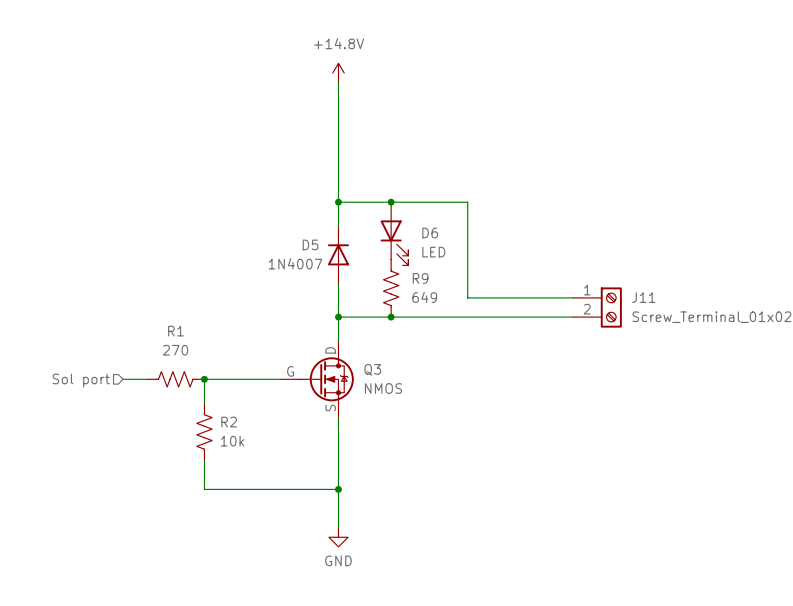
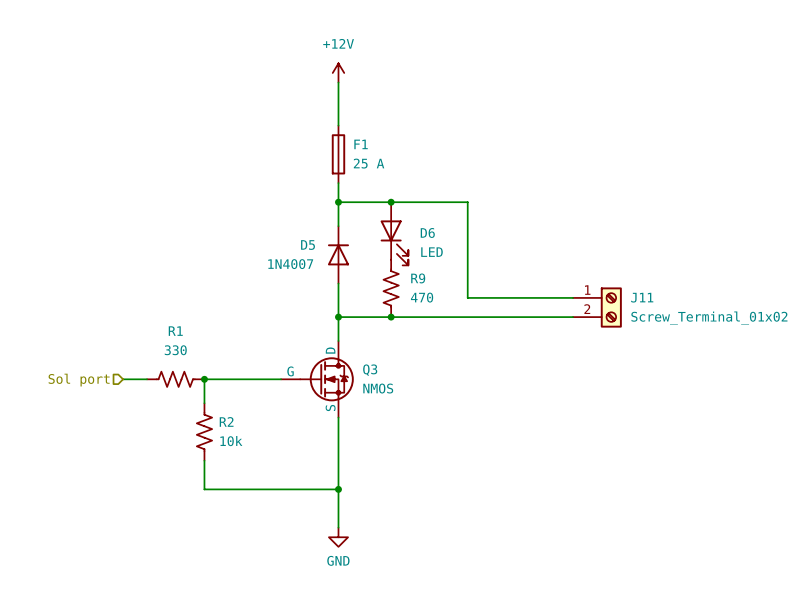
power symbol: +14.8V (338, 72) -> +12V (338, 72)
F1: none -> 25 A (338, 154)
R9 value: 649 (424, 297) -> 470 (422, 297)
R1 value: 270 (175, 350) -> 330 (175, 350)

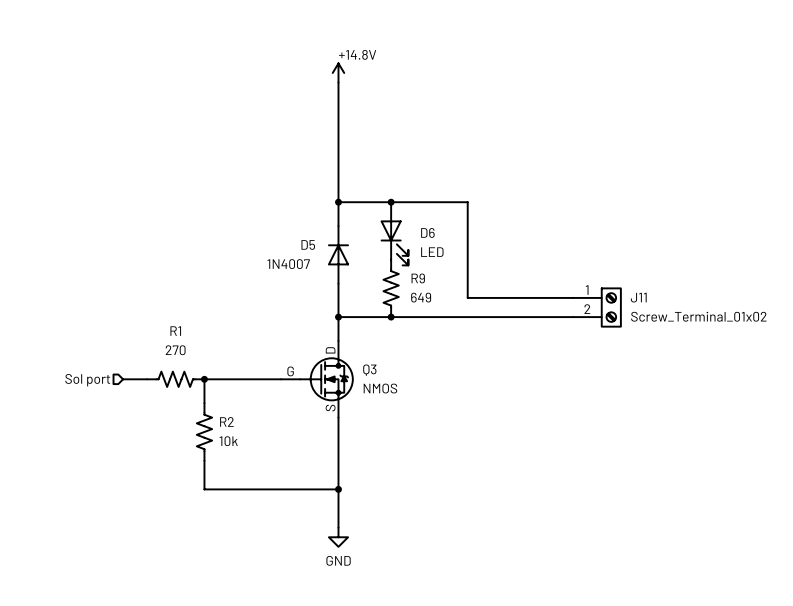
power symbol text: +12V (338, 43) -> none
label: none -> +14.8V (357, 54)
F1: 25 A (338, 154) -> none
R9 value: 470 (422, 297) -> 649 (421, 297)
R1 value: 330 (175, 350) -> 270 (175, 350)

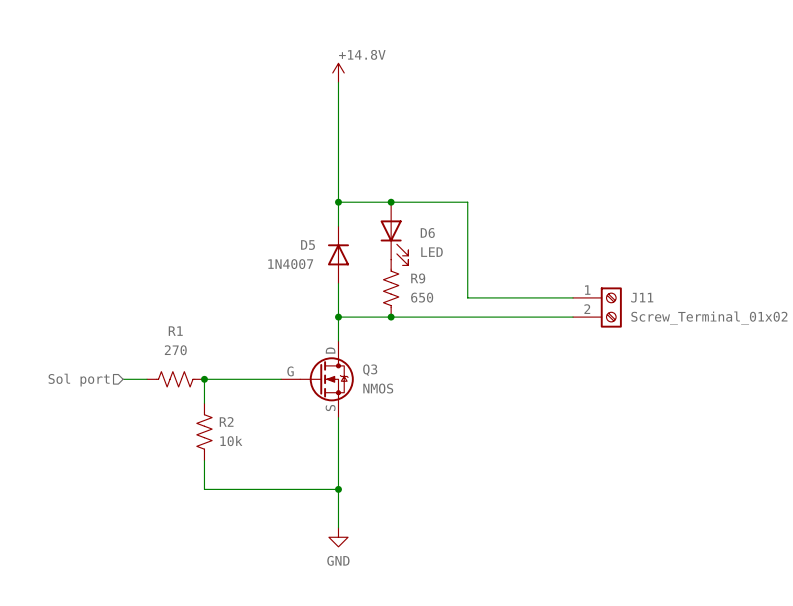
R9 value: 649 (421, 297) -> 650 (422, 297)

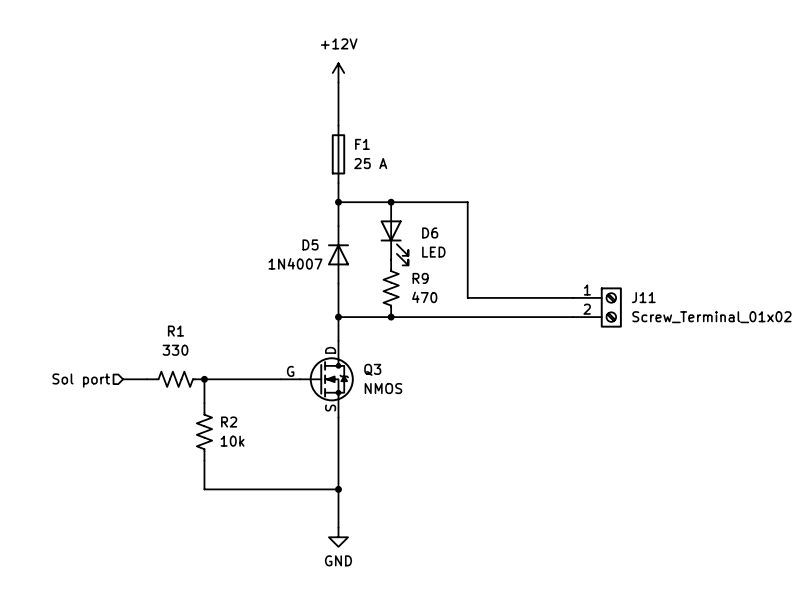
power symbol text: none -> +12V (339, 43)
label: +14.8V (362, 54) -> none
F1: none -> 25 A (338, 154)
R9 value: 650 (422, 297) -> 470 (424, 297)
R1 value: 270 (175, 350) -> 330 (175, 350)

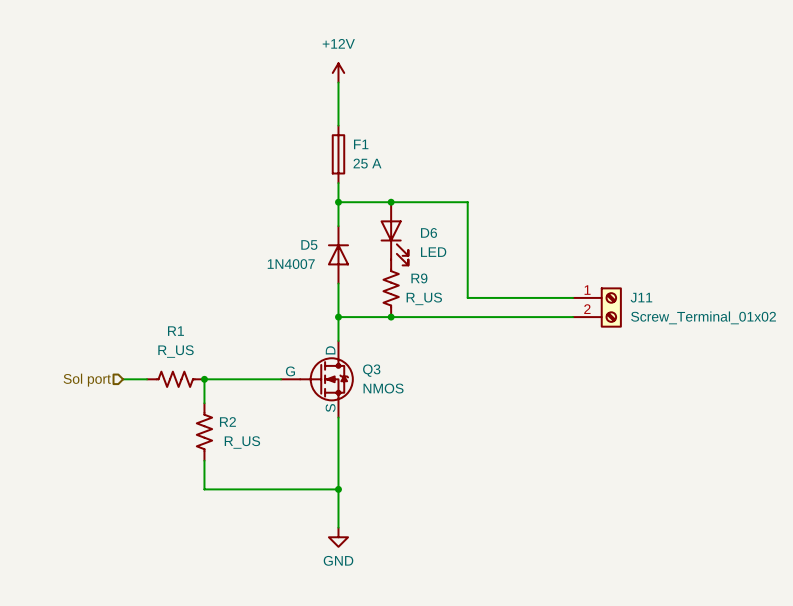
R9 value: 470 (424, 297) -> R_US (424, 298)
R1 value: 330 (175, 350) -> R_US (175, 351)
R2 value: 10k (232, 441) -> R_US (242, 442)

